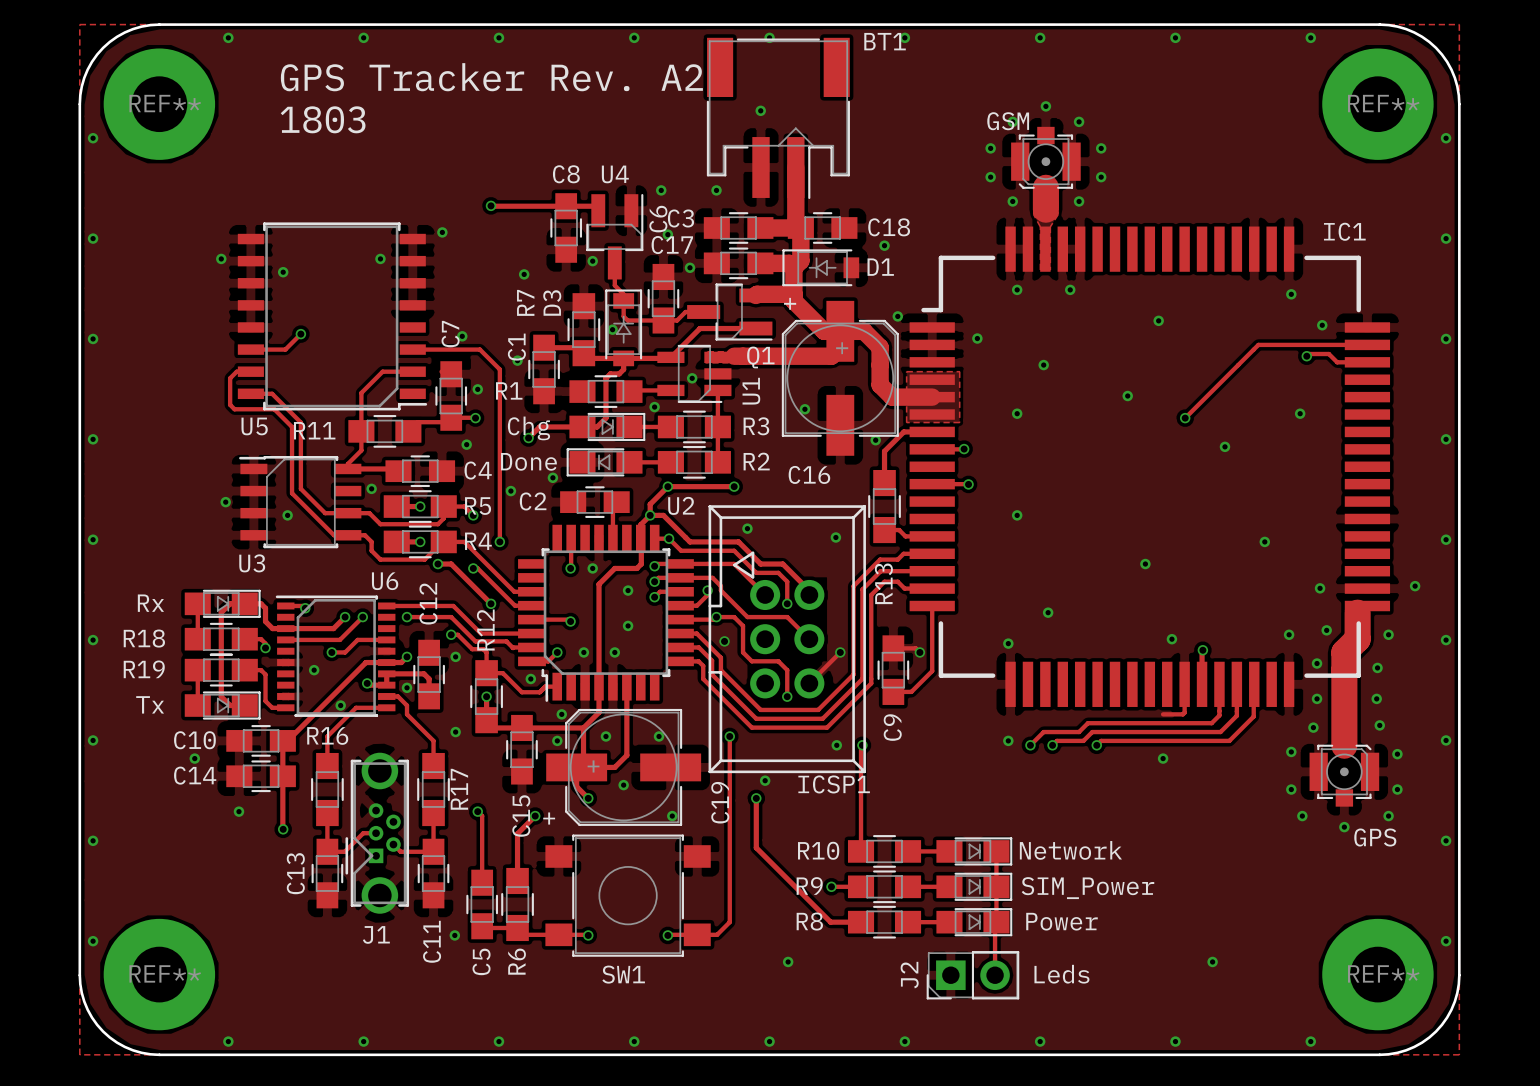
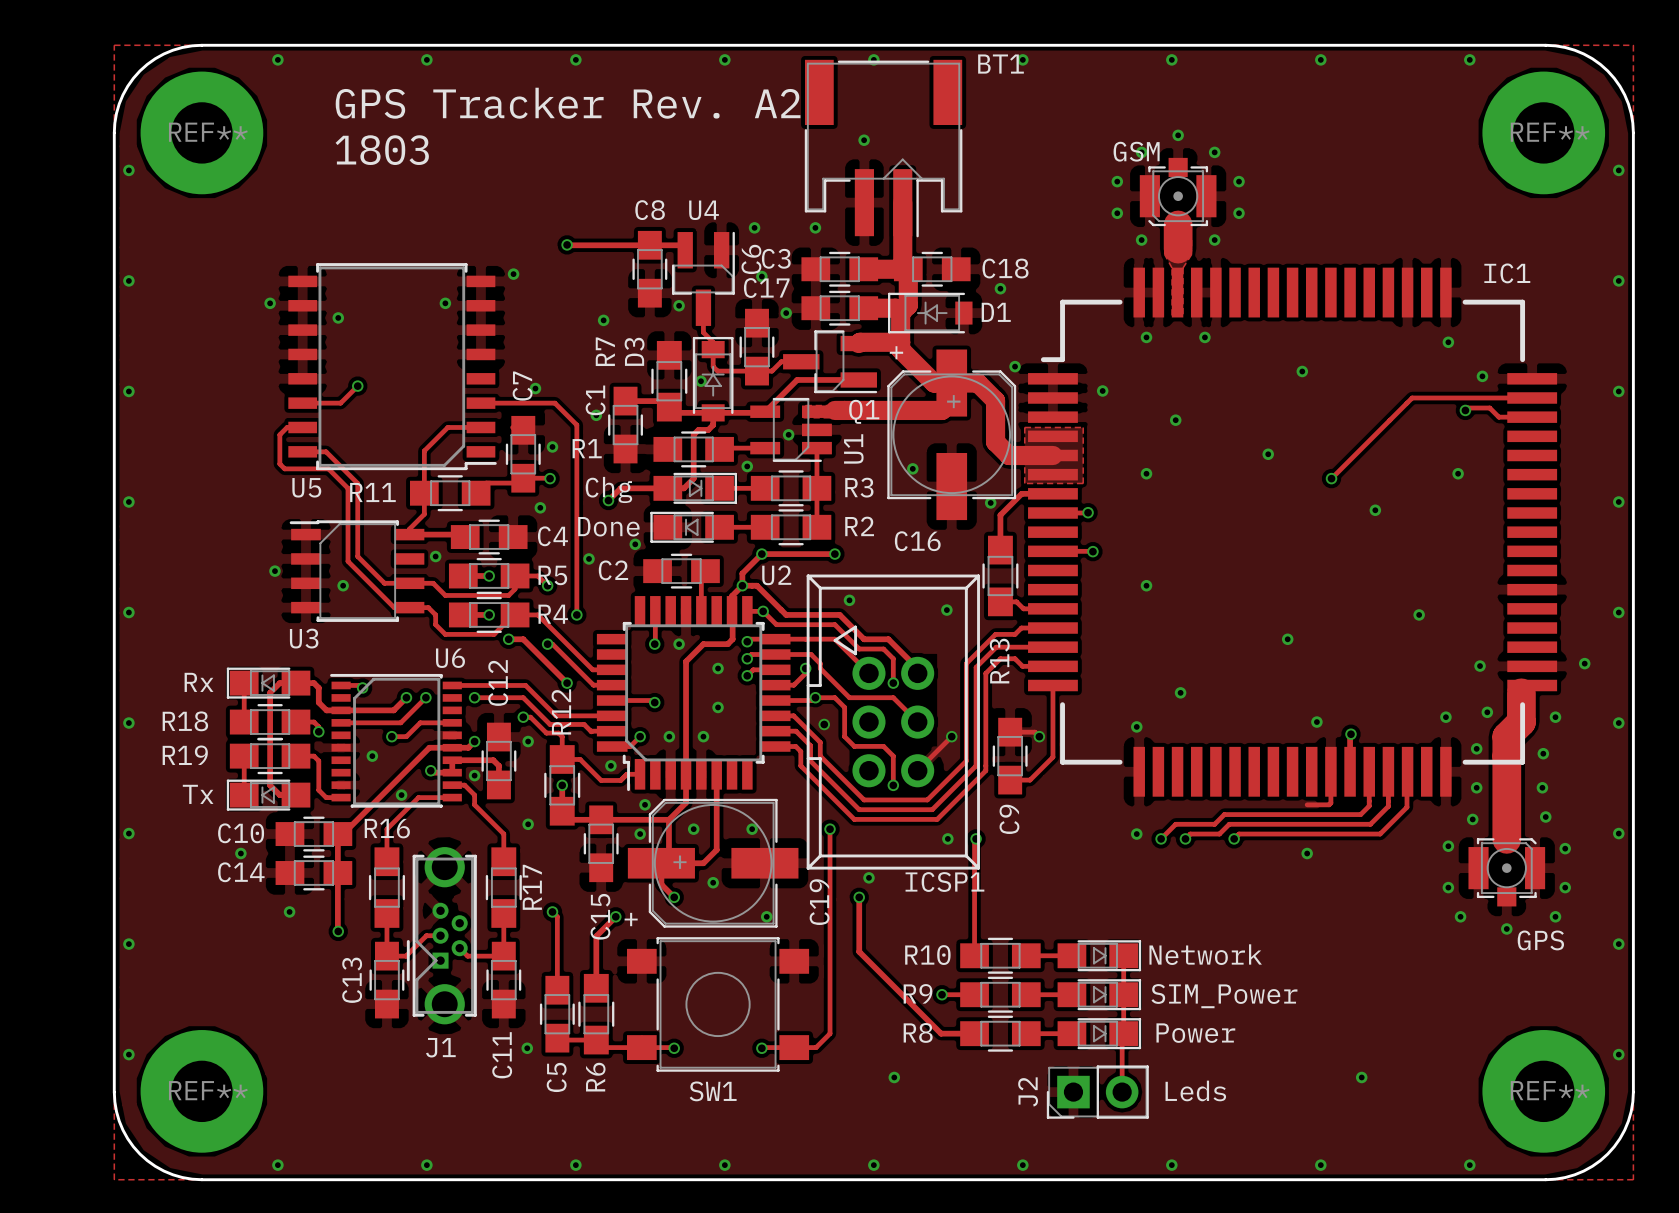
part rotation: 0° (222, 603) -> 180° (268, 683)
part rotation: 0° (222, 705) -> 180° (268, 795)

